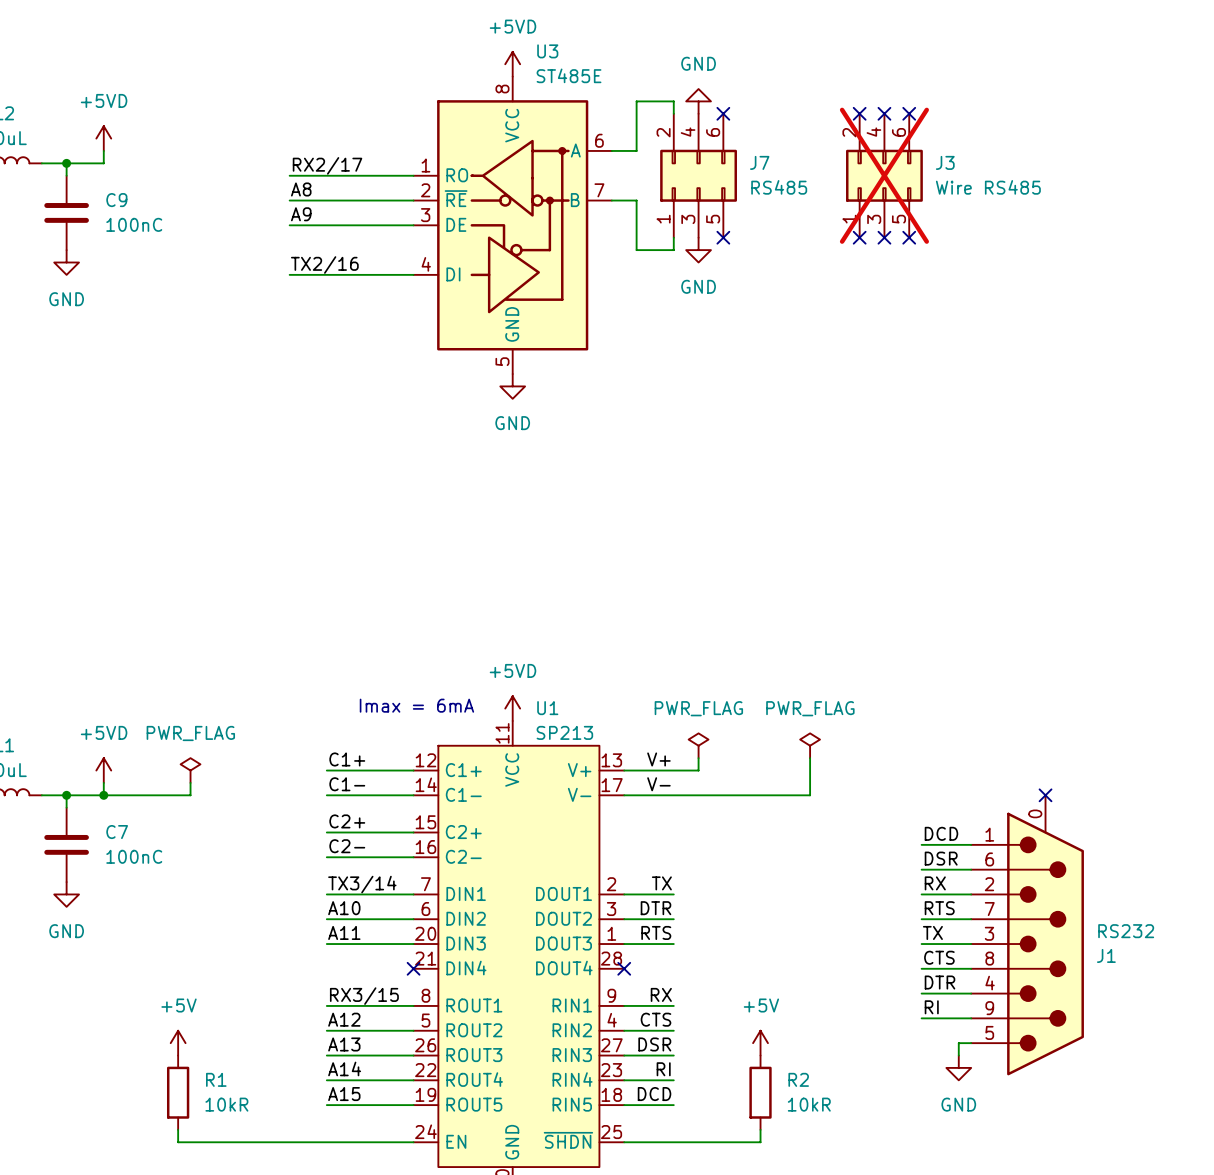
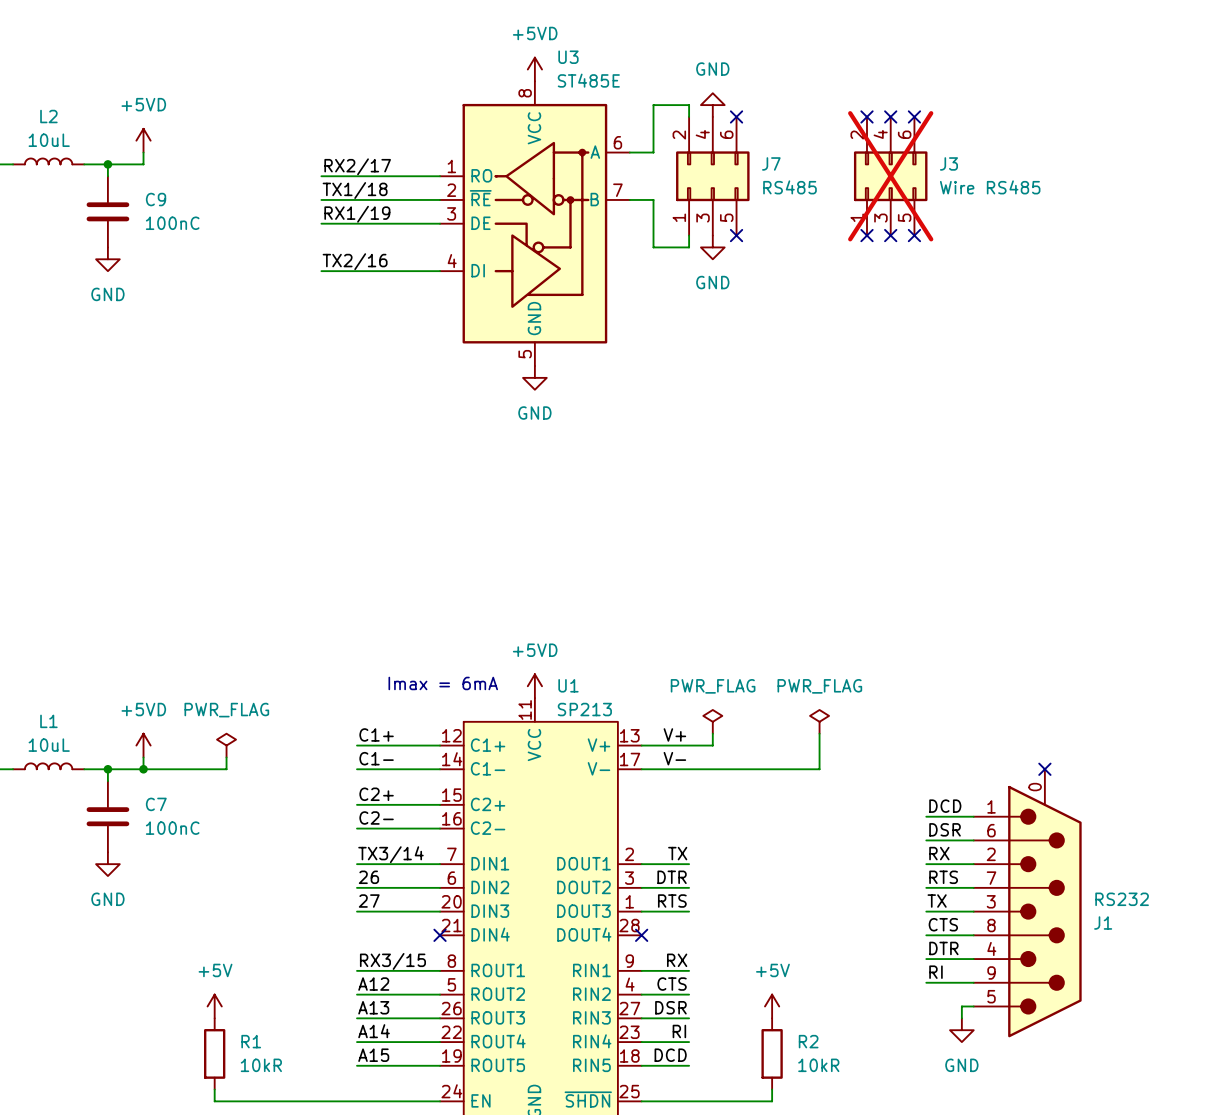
label: A8 (301, 189) -> TX1/18 (355, 190)
label: A9 (301, 214) -> RX1/19 (357, 214)
label: A10 (344, 908) -> 26 (368, 877)
label: A11 (344, 932) -> 27 (369, 901)

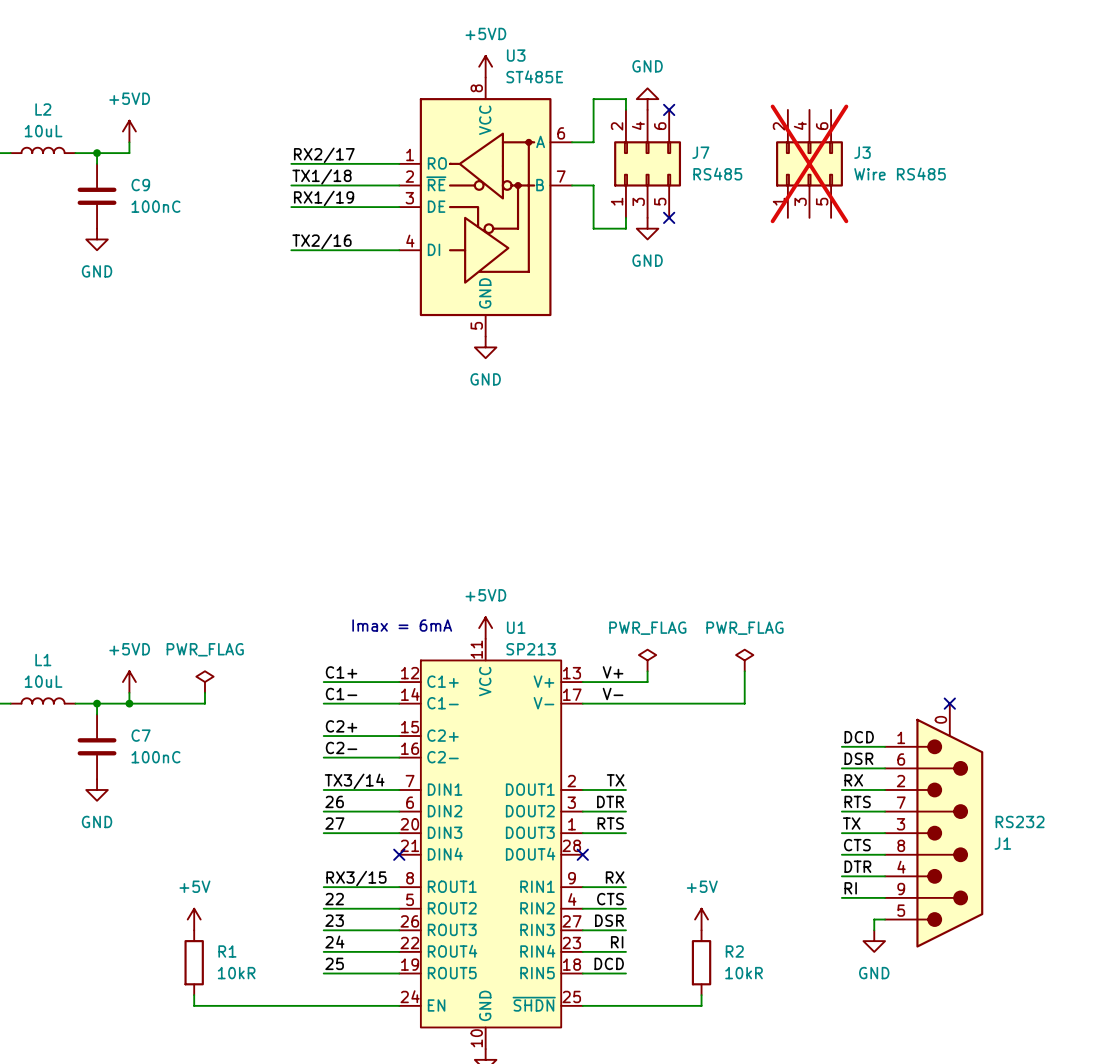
no-connect mark: (866, 116) -> none
no-connect mark: (890, 116) -> none
no-connect mark: (914, 116) -> none
no-connect mark: (866, 235) -> none
no-connect mark: (890, 235) -> none
no-connect mark: (914, 235) -> none
label: A12 (373, 984) -> 22 (334, 899)
label: A13 (373, 1007) -> 23 (334, 920)
label: A14 (374, 1031) -> 24 (334, 942)
label: A15 (373, 1055) -> 25 (334, 963)

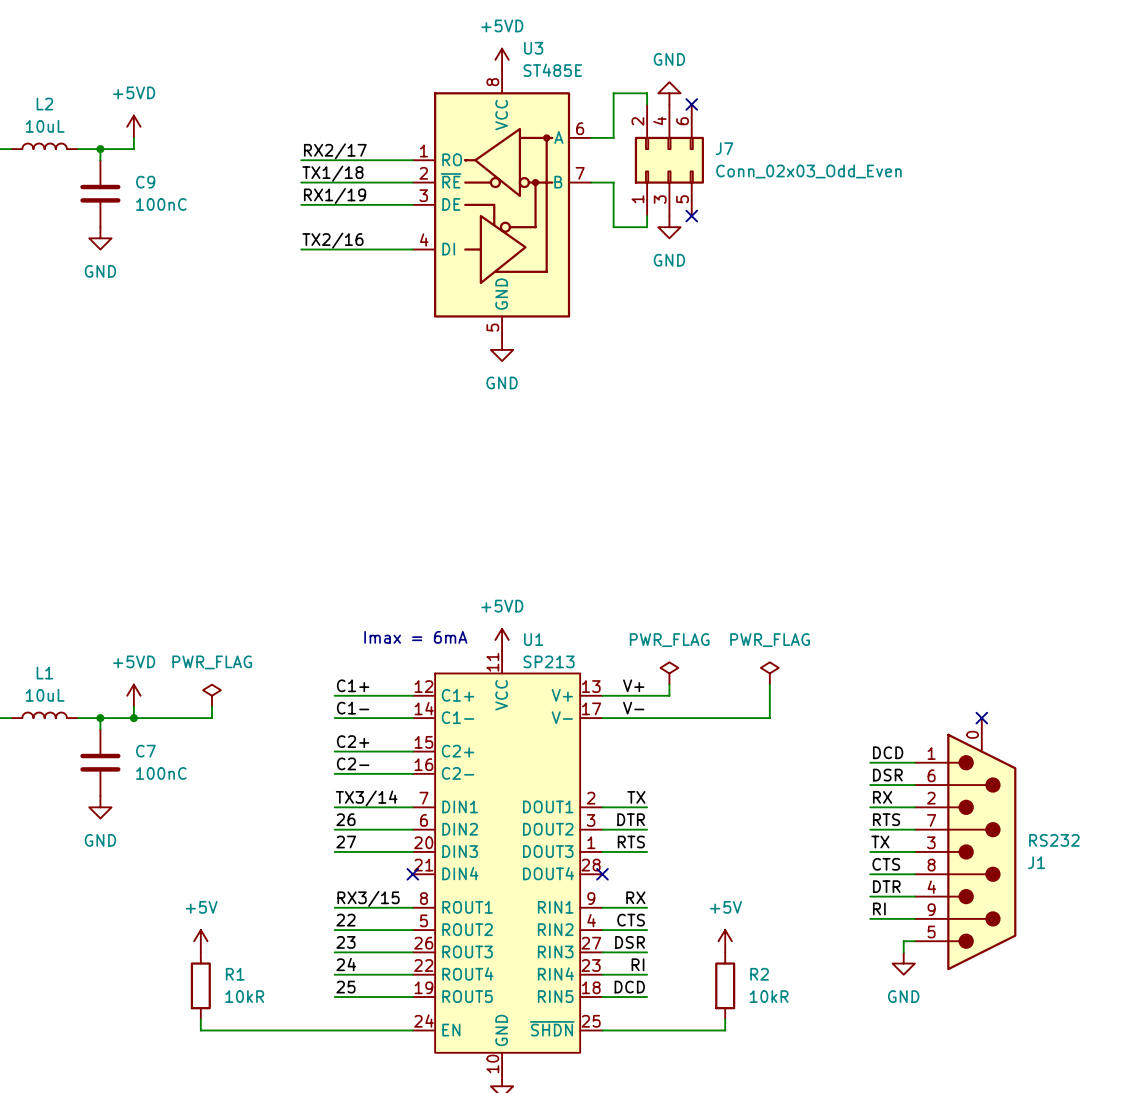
J3: Wire RS485 (809, 163) -> none
J7 value: RS485 (717, 174) -> Conn_02x03_Odd_Even (808, 171)

